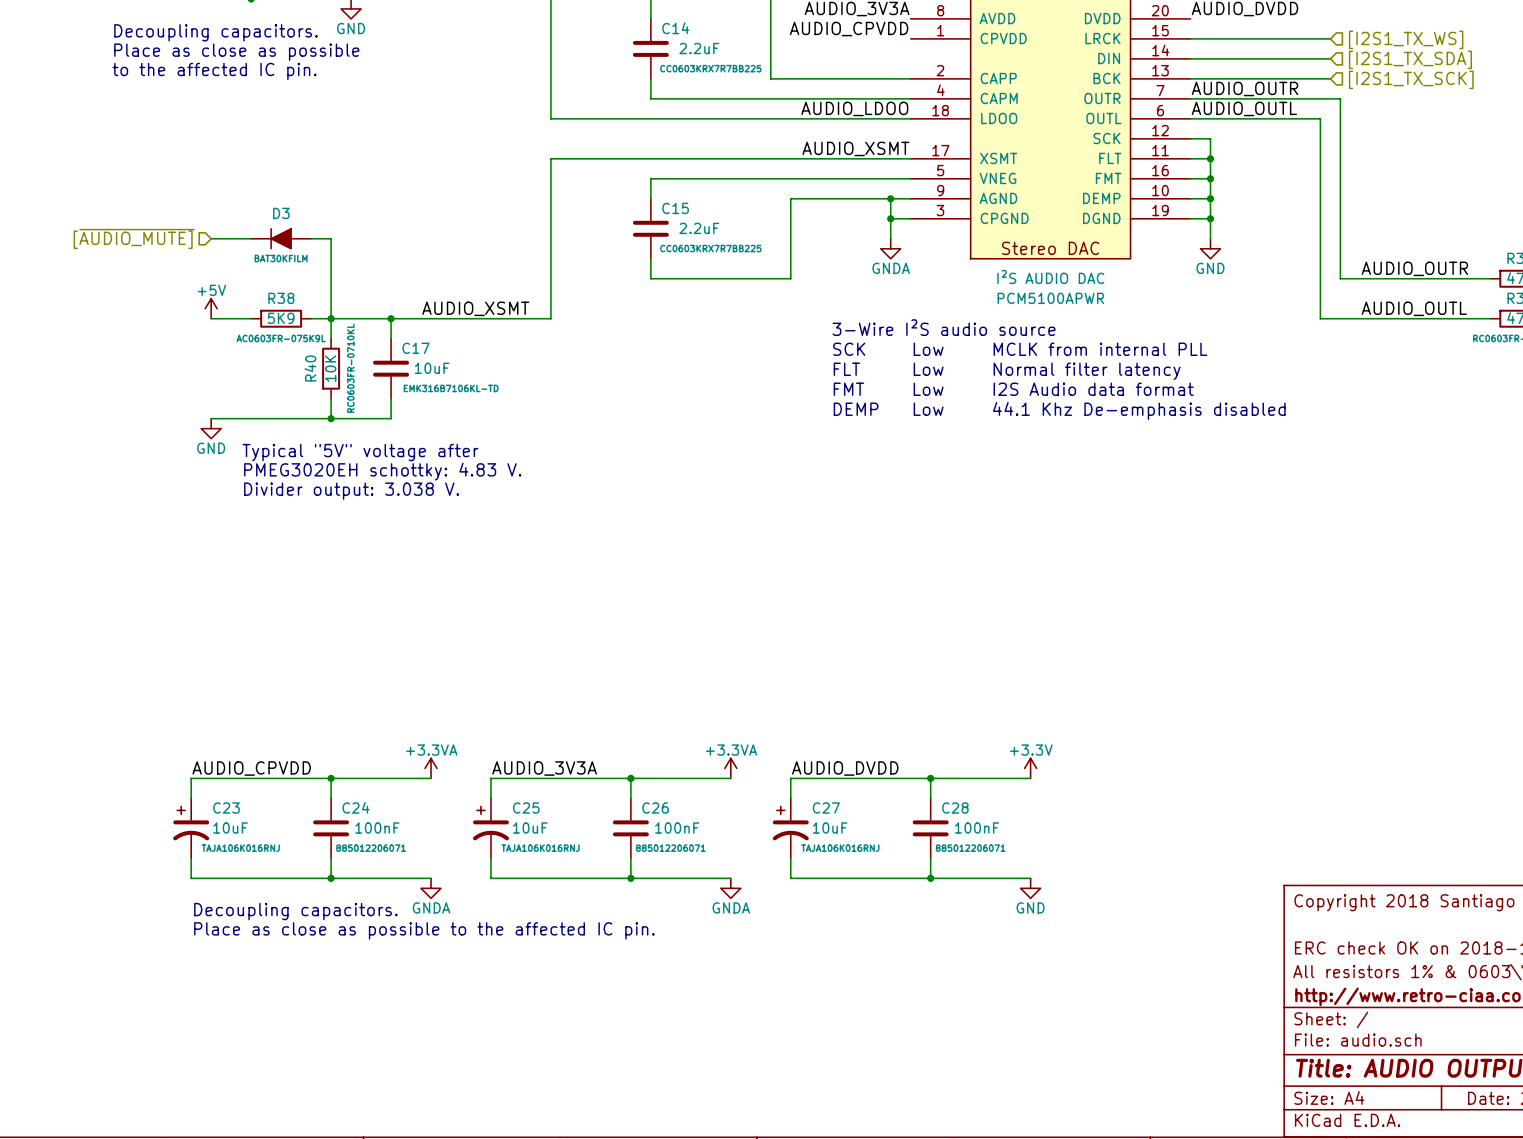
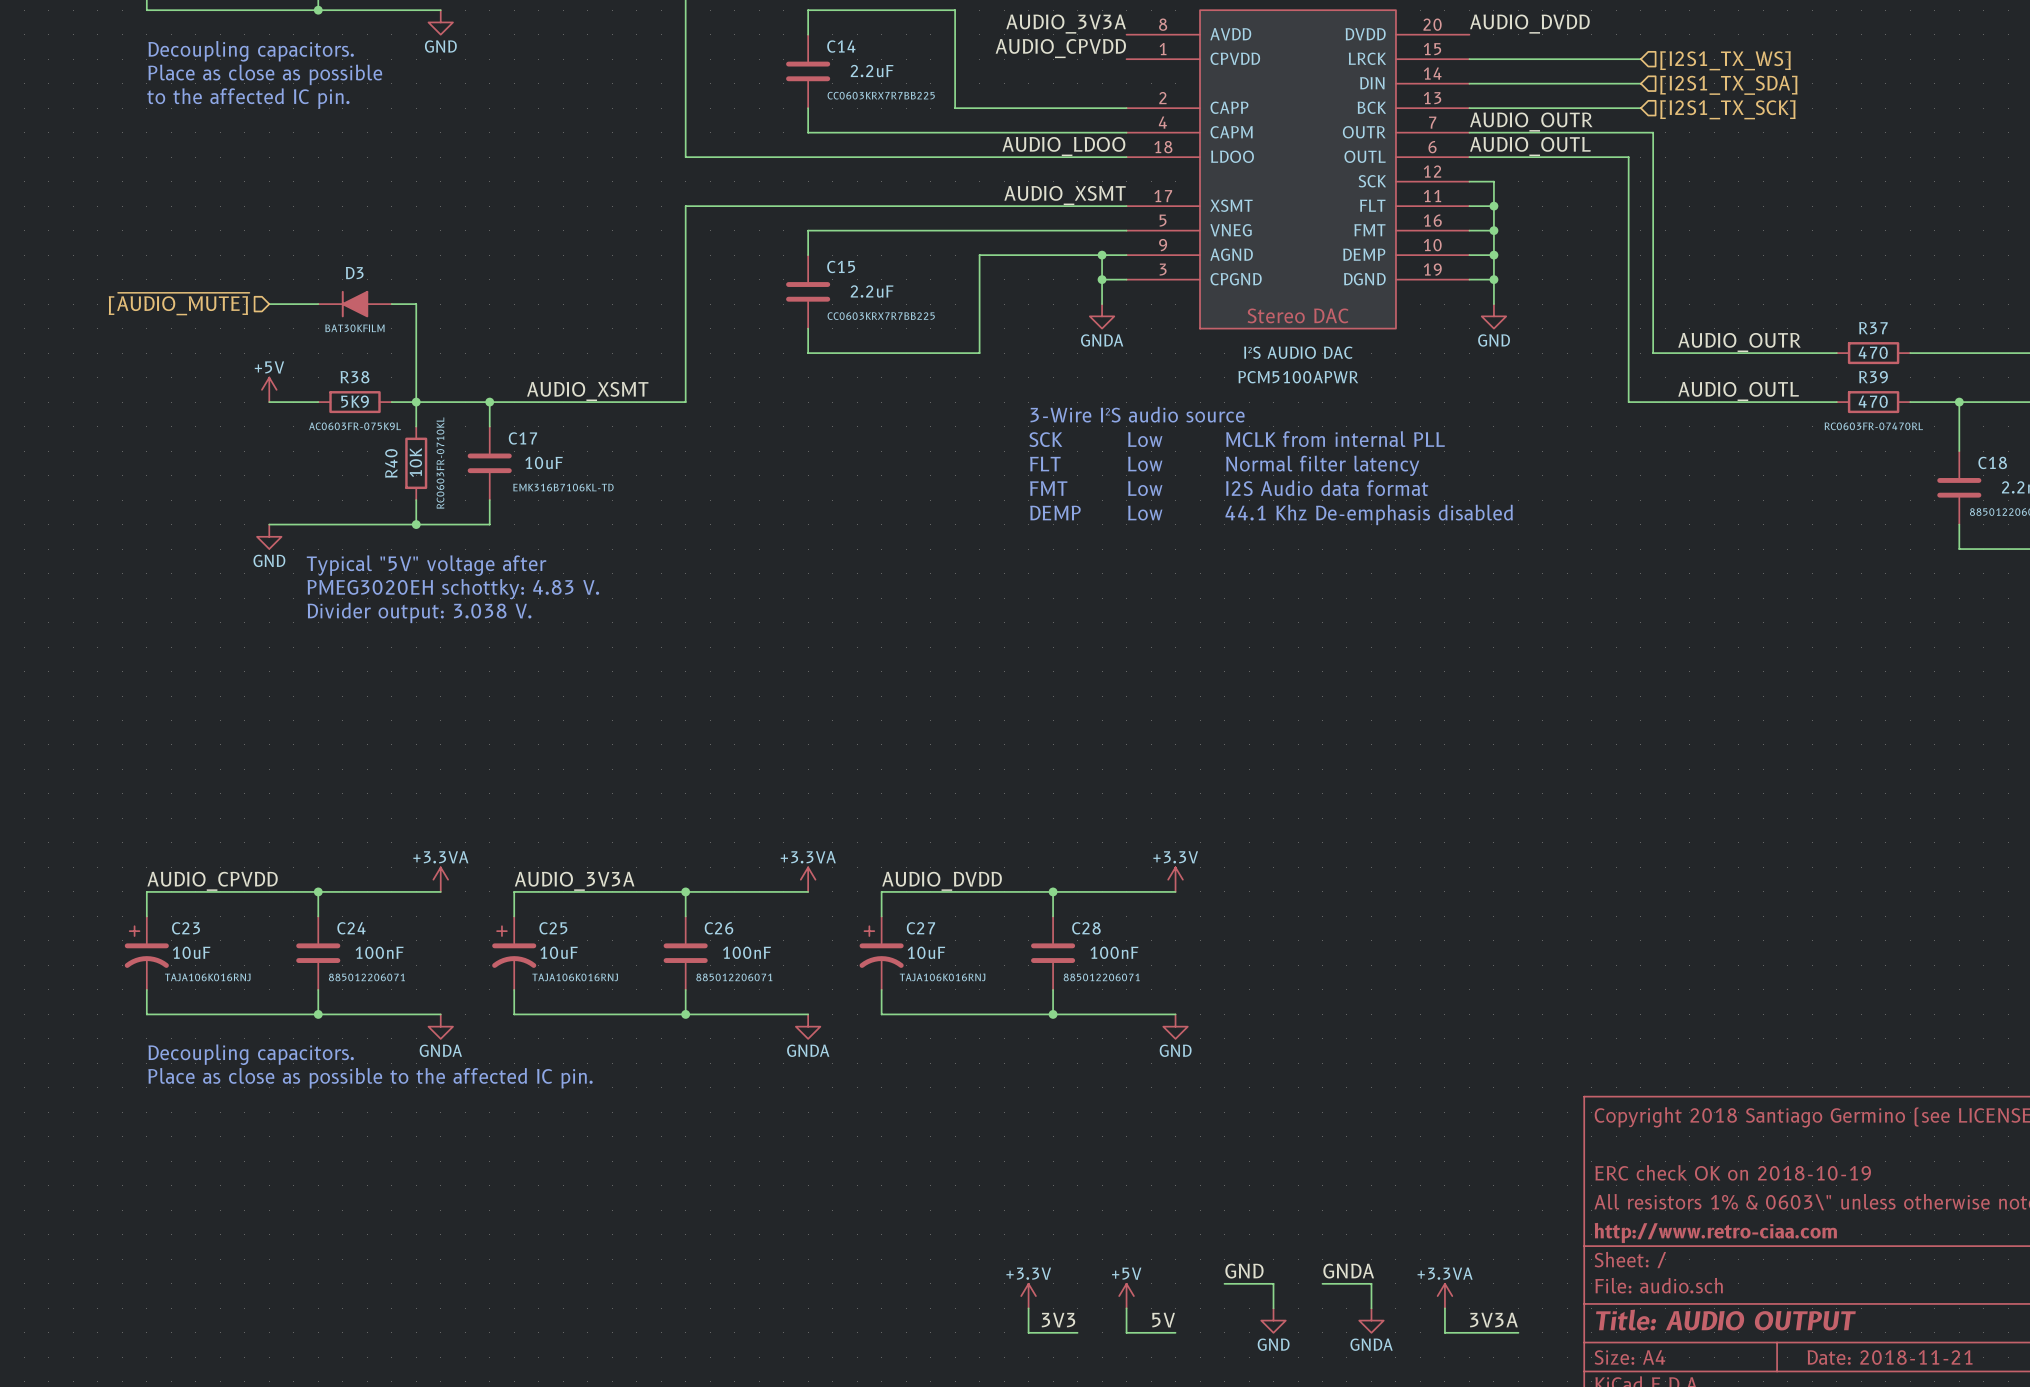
junction: none -> (318, 891)
junction: none -> (685, 891)
junction: none -> (1053, 891)
label position: AUDIO_CPVDD (251, 768) -> AUDIO_CPVDD (212, 881)
power symbol position: +3.3VA (431, 768) -> +3.3VA (440, 879)
label position: AUDIO_3V3A (544, 768) -> AUDIO_3V3A (574, 881)
power symbol position: +3.3VA (730, 768) -> +3.3VA (808, 879)
label position: AUDIO_DVDD (845, 768) -> AUDIO_DVDD (942, 881)
power symbol position: +3.3V (1030, 768) -> +3.3V (1175, 879)
wire: (331, 778) (331, 798) -> (318, 891) (318, 916)
junction: (331, 778) -> none
wire: (431, 778) (191, 778) (191, 798) -> (440, 891) (146, 891) (146, 916)
wire: (630, 778) (630, 798) -> (685, 891) (685, 916)
junction: (630, 778) -> none
wire: (730, 778) (490, 778) (490, 798) -> (808, 891) (514, 891) (514, 916)
wire: (930, 778) (930, 798) -> (1053, 891) (1053, 916)
junction: (930, 778) -> none
wire: (1030, 778) (790, 778) (790, 798) -> (1175, 891) (881, 891) (881, 916)
junction: none -> (318, 1014)
junction: none -> (685, 1014)
junction: none -> (1053, 1014)
C23 position: (191, 828) -> (146, 953)
C24 position: (331, 828) -> (318, 953)
C25 position: (490, 828) -> (514, 953)
C26 position: (630, 828) -> (685, 953)
C27 position: (790, 828) -> (881, 953)
C28 position: (930, 828) -> (1053, 953)
power symbol: none -> GND (1175, 1026)
wire: (191, 858) (191, 878) (431, 878) -> (146, 989) (146, 1014) (440, 1014)
wire: (331, 858) (331, 878) -> (318, 989) (318, 1014)
wire: (490, 858) (490, 878) (730, 878) -> (514, 989) (514, 1014) (808, 1014)
wire: (630, 858) (630, 878) -> (685, 989) (685, 1014)
wire: (790, 858) (790, 878) (1030, 878) -> (881, 989) (881, 1014) (1175, 1014)
wire: (930, 858) (930, 878) -> (1053, 989) (1053, 1014)
junction: (331, 878) -> none
junction: (630, 878) -> none
junction: (930, 878) -> none
power symbol position: GNDA (431, 888) -> GNDA (440, 1026)
power symbol position: GNDA (730, 888) -> GNDA (808, 1026)
power symbol: GND (1030, 888) -> none
text position: Decoupling capacitors. (295, 911) -> Decoupling capacitors. (251, 1054)
text position: Place as close as possible to the affected IC pin. (424, 930) -> Place as close as possible to the affected IC pin. (370, 1078)
label: none -> GND (1244, 1271)
label: none -> GNDA (1348, 1271)
wire: none -> (1224, 1283) (1273, 1283) (1273, 1308)
wire: none -> (1322, 1283) (1371, 1283) (1371, 1308)
power symbol: none -> +3.3V (1028, 1296)
power symbol: none -> +5V (1126, 1296)
power symbol: none -> +3.3VA (1444, 1296)
wire: none -> (1028, 1308) (1028, 1332) (1077, 1332)
wire: none -> (1126, 1308) (1126, 1332) (1175, 1332)
wire: none -> (1444, 1308) (1444, 1332) (1518, 1332)
label: none -> 3V3 (1058, 1320)
label: none -> 5V (1163, 1320)
label: none -> 3V3A (1493, 1320)
power symbol: none -> GND (1273, 1320)
power symbol: none -> GNDA (1371, 1320)

